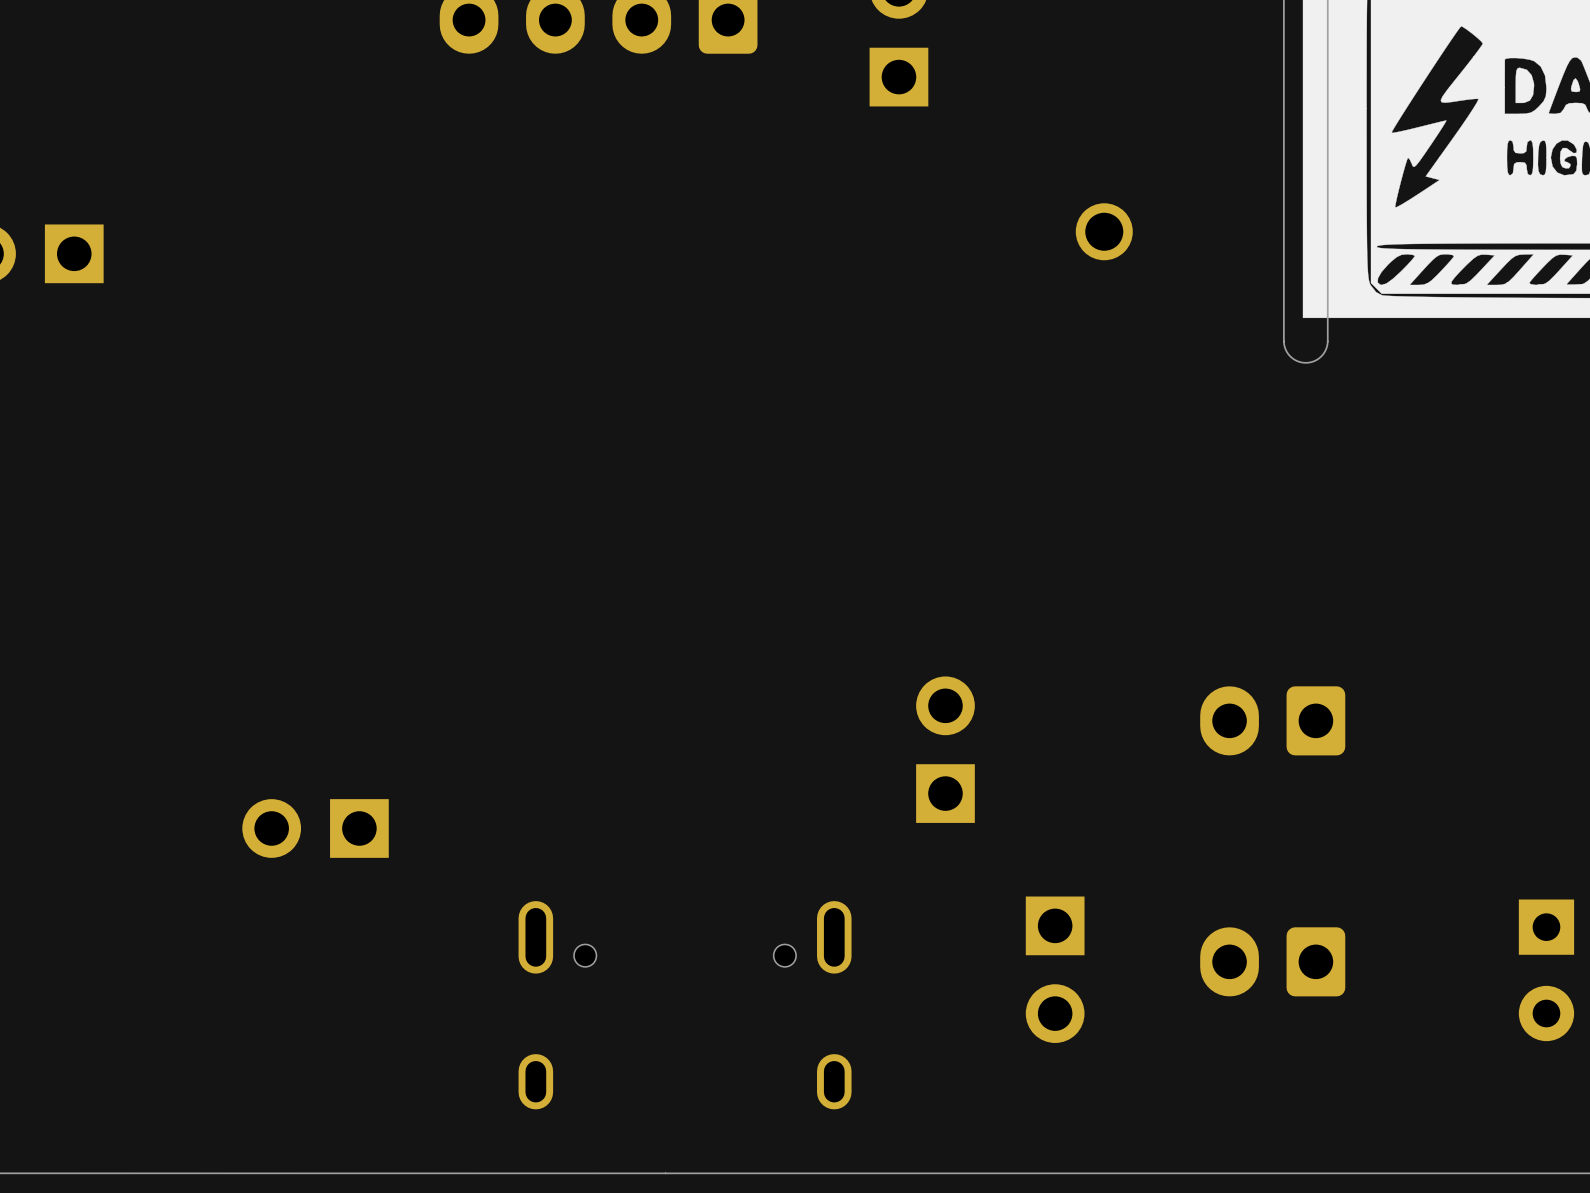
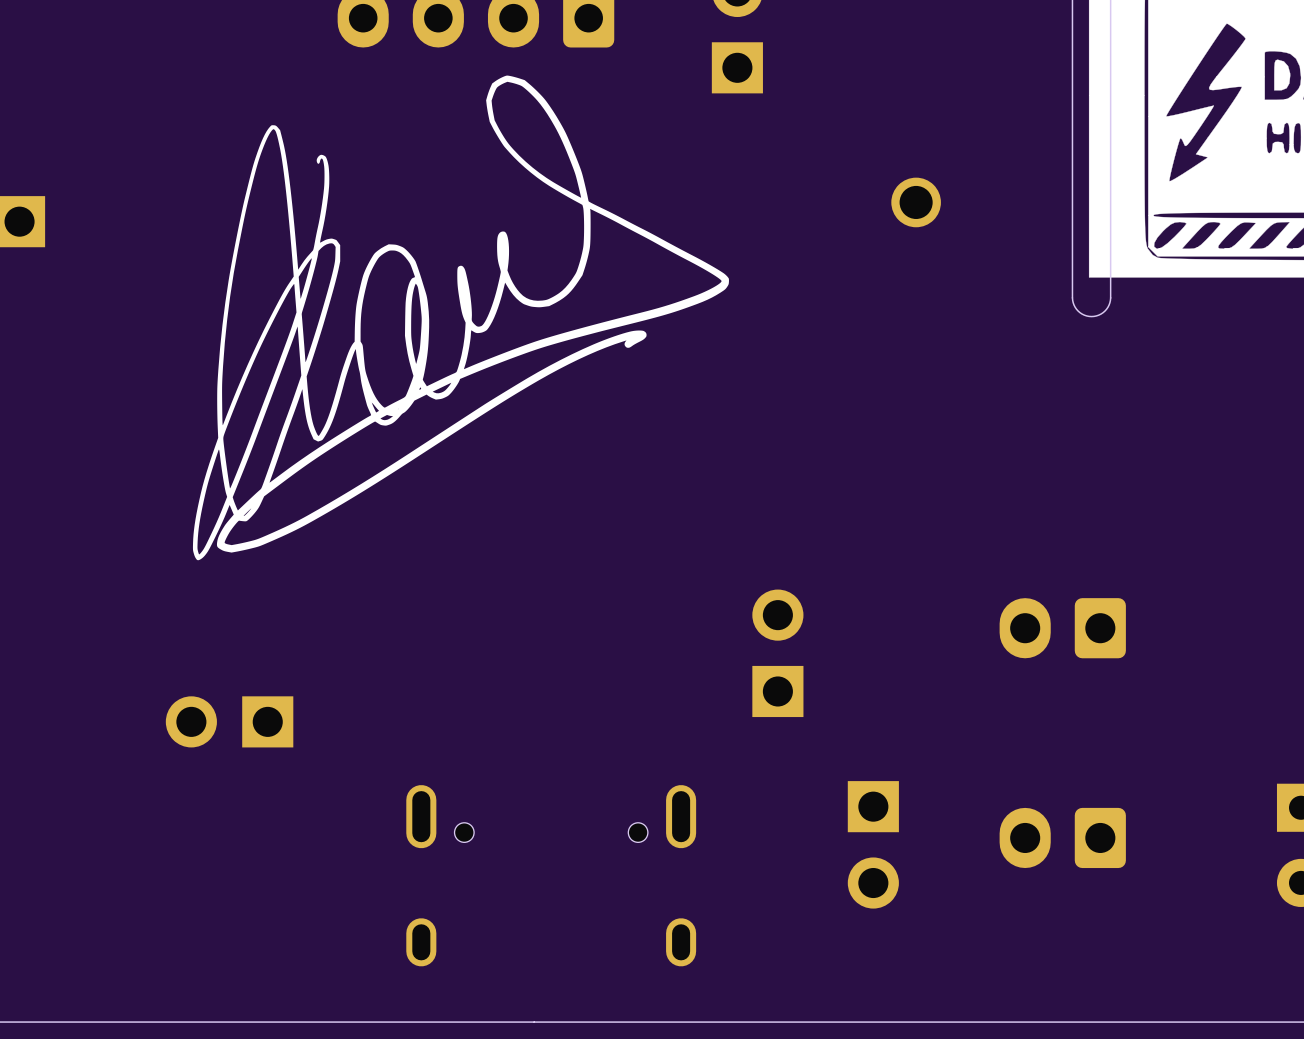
drawing: none -> [192, 75, 729, 561]

